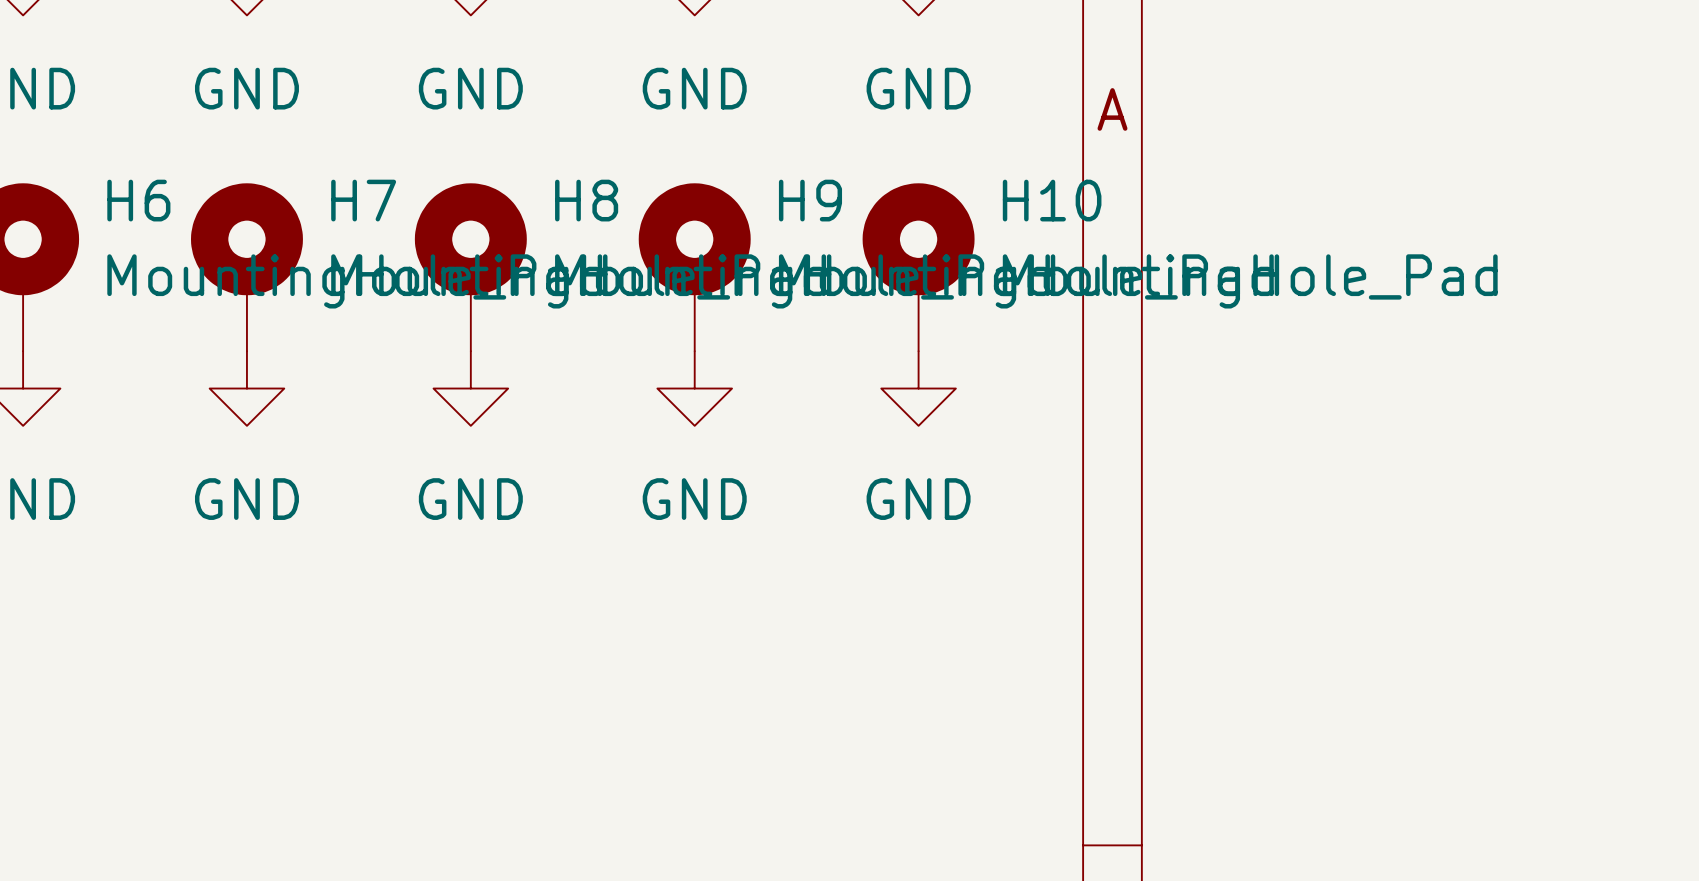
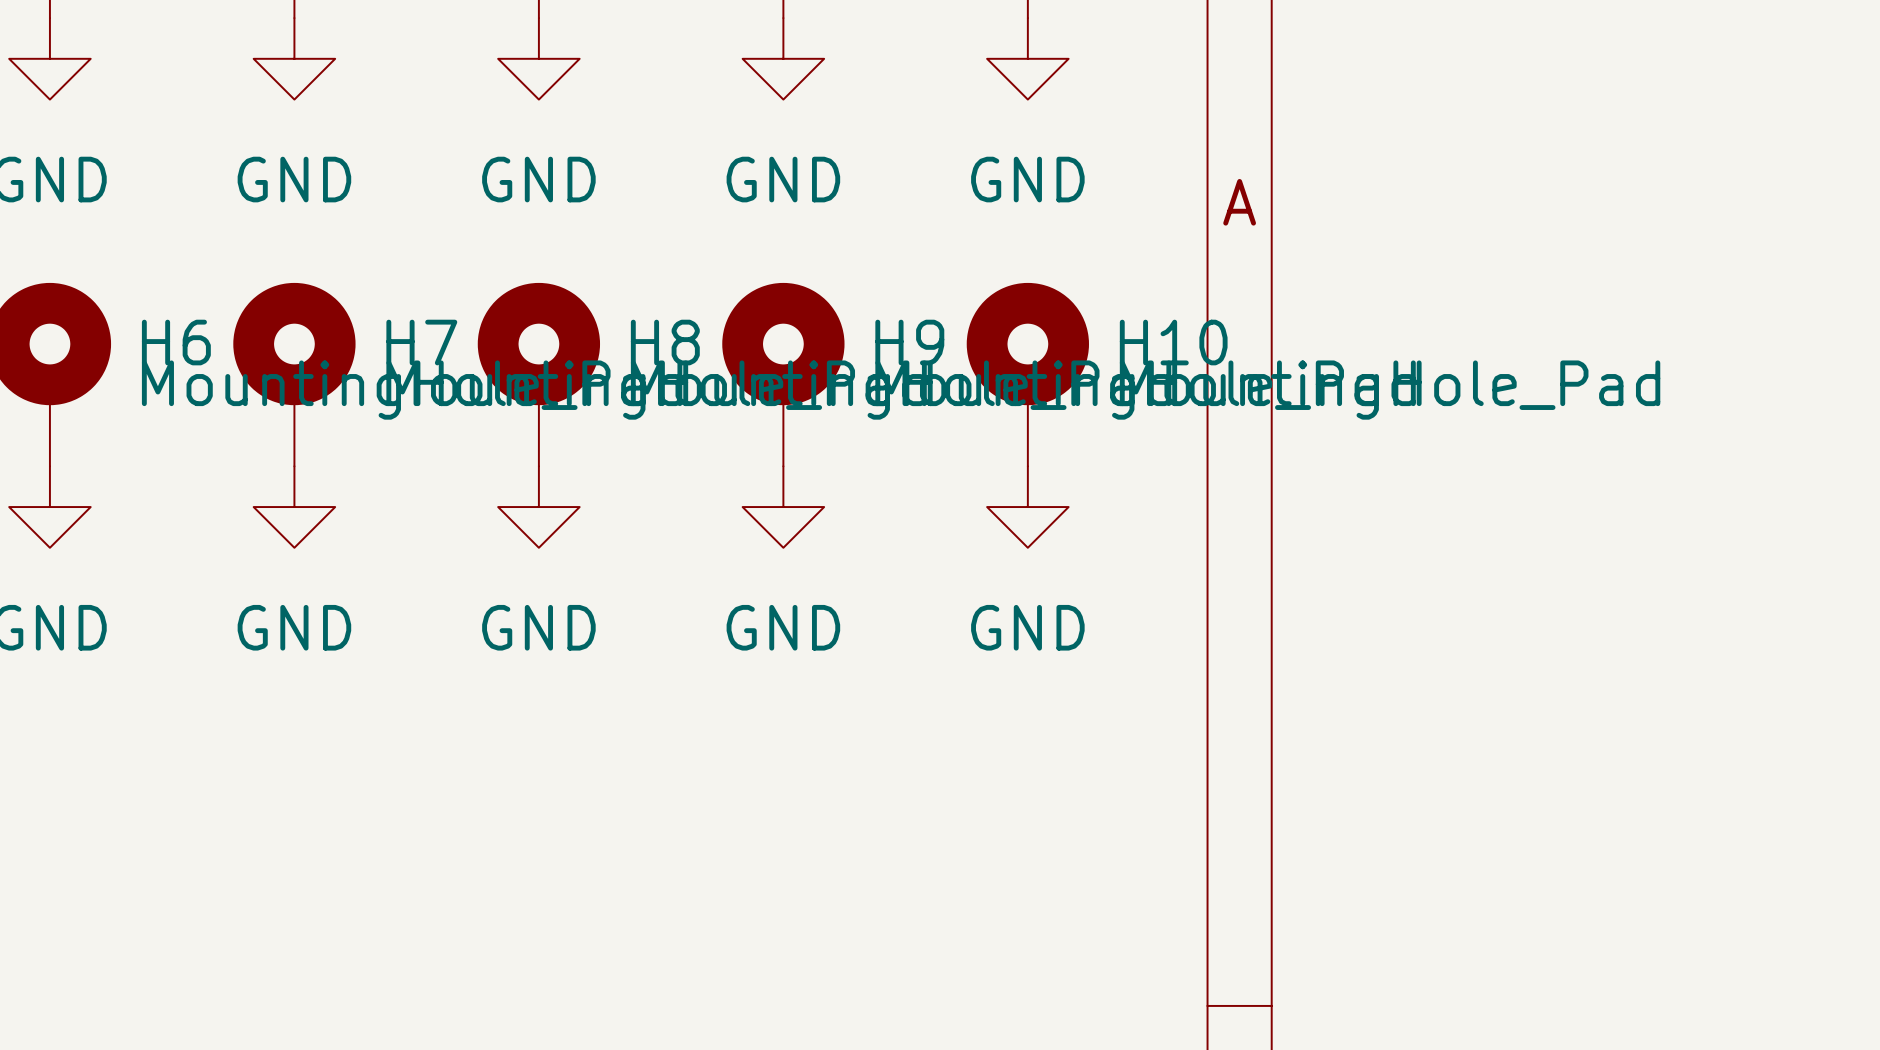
H6 name position: H6 (138, 200) -> H6 (176, 342)
H7 name position: H7 (363, 200) -> H7 (421, 342)
H8 name position: H8 (586, 200) -> H8 (665, 342)
H9 name position: H9 (810, 200) -> H9 (909, 342)
H10 name position: H10 (1052, 200) -> H10 (1173, 342)

